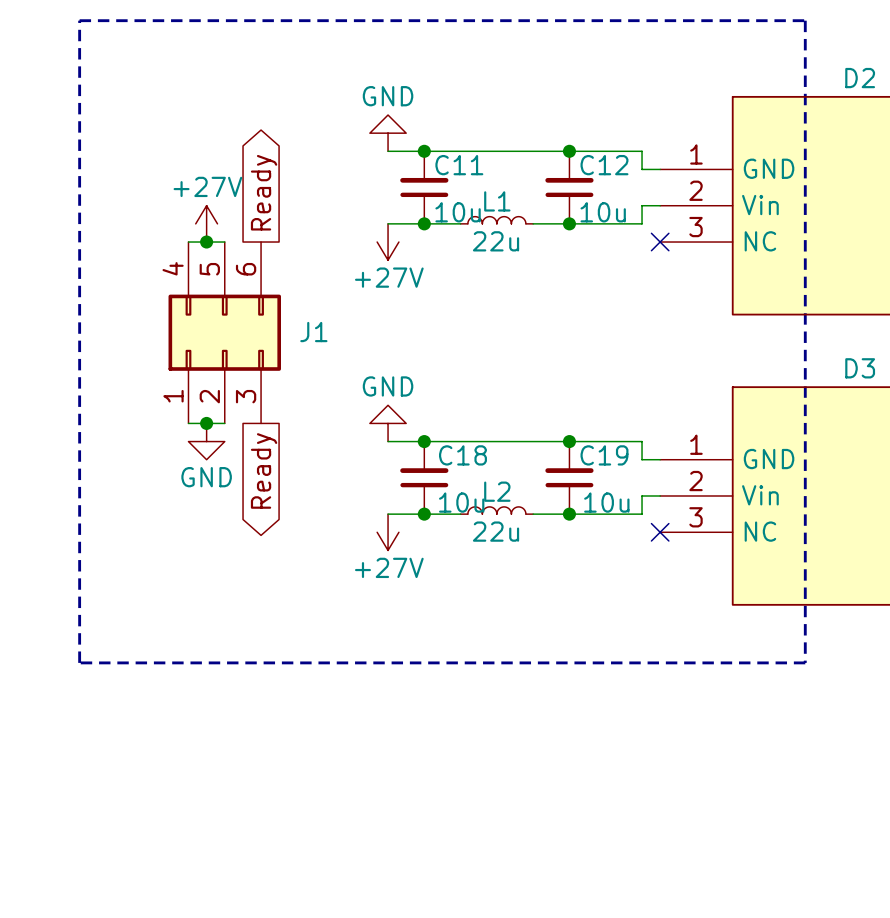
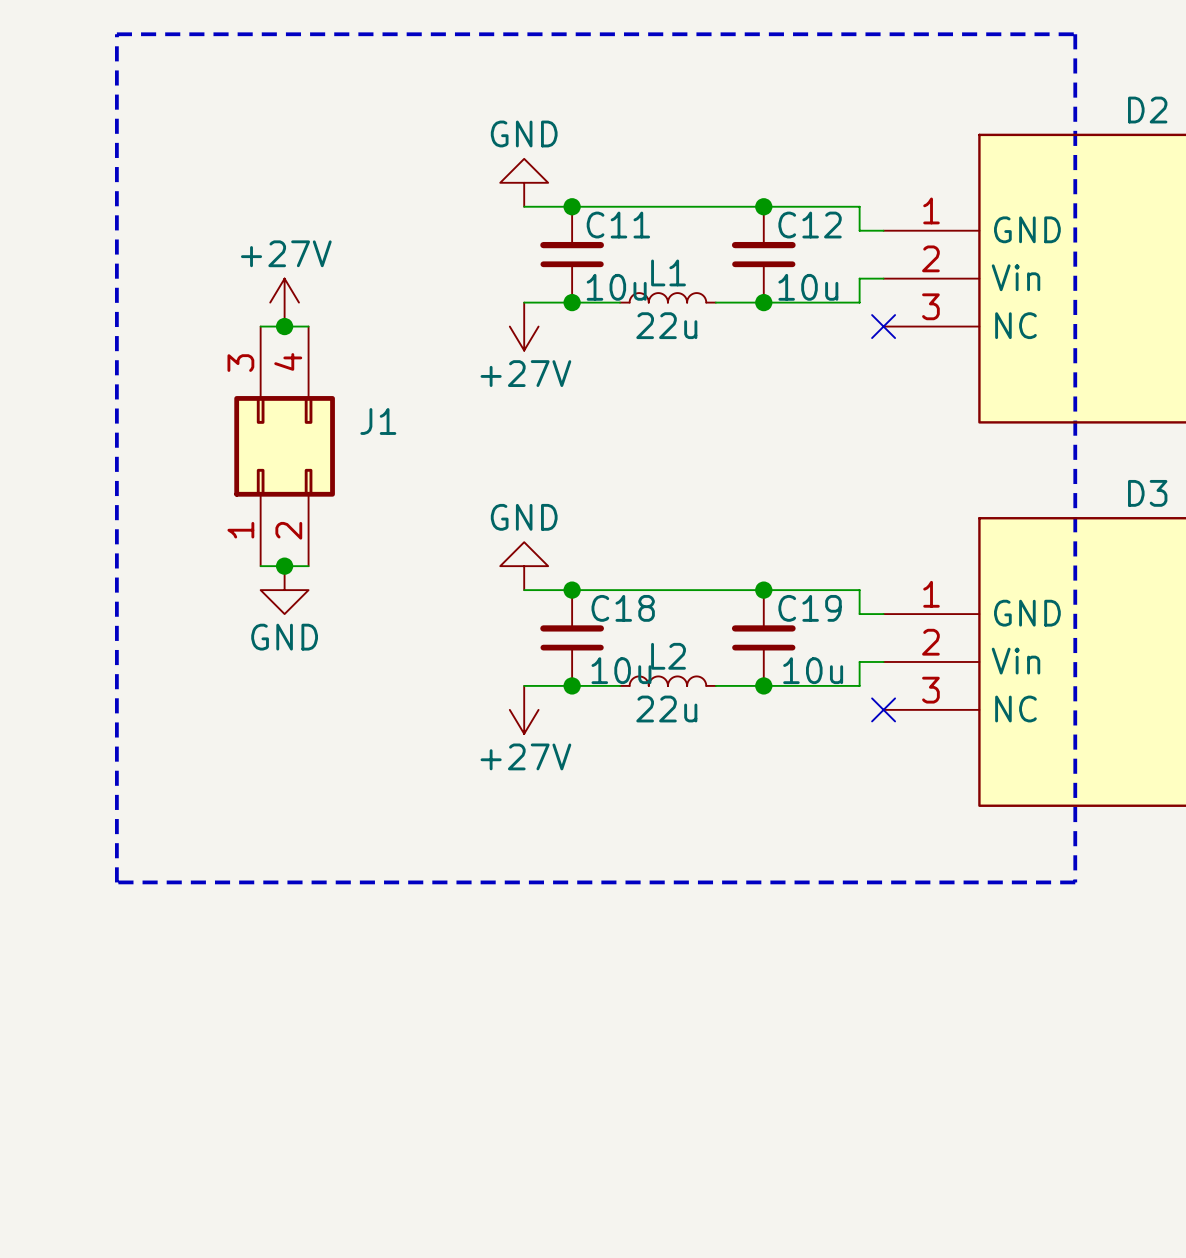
global label: Ready (264, 192) -> none
J1 symbol: [168, 242, 282, 424] -> [234, 326, 335, 567]
global label: Ready (264, 470) -> none

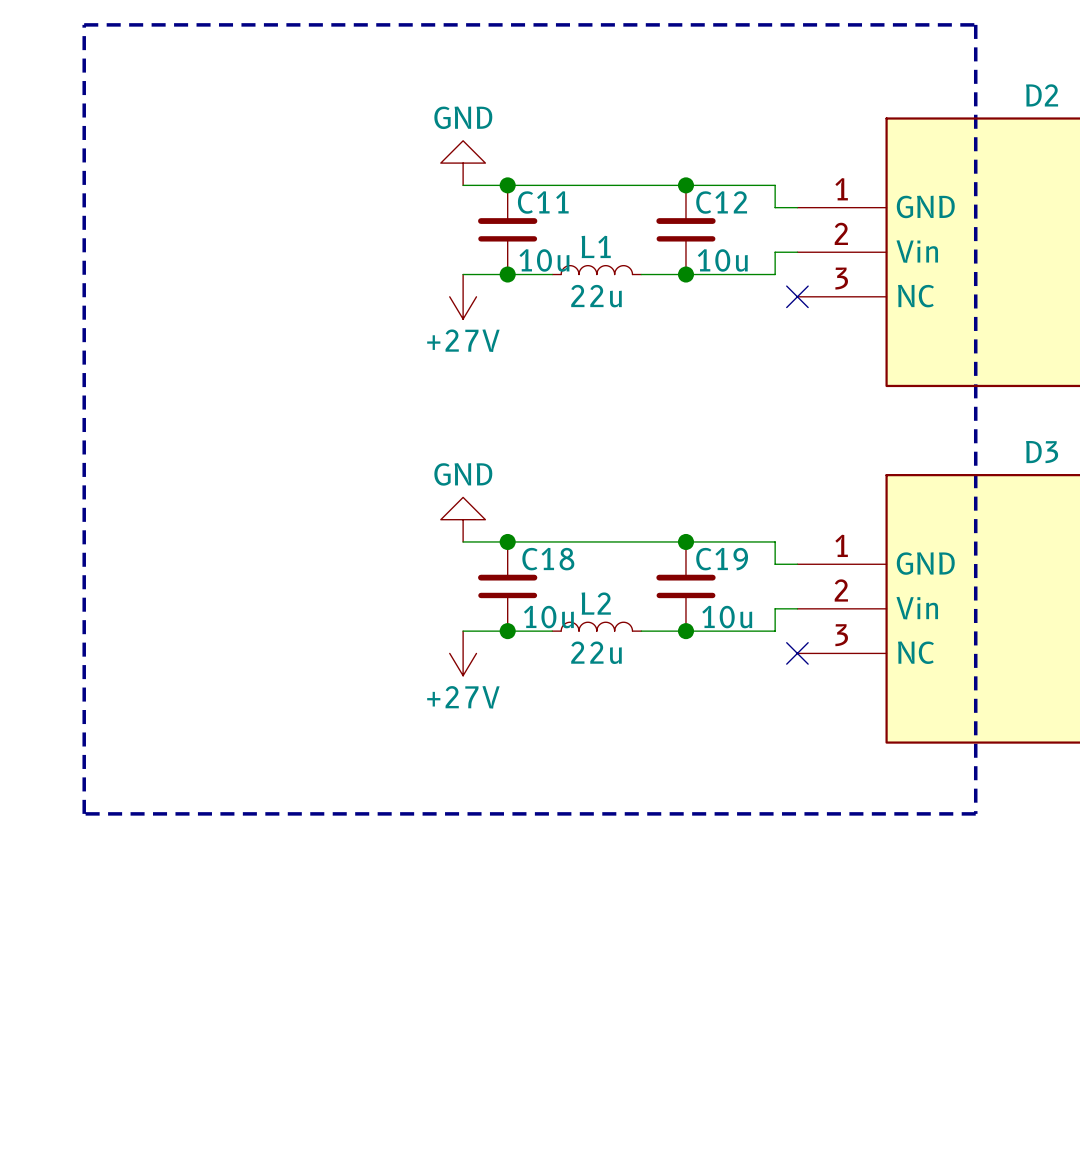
power symbol: +27V (284, 302) -> none
wire: (260, 326) (308, 326) -> none
junction: (284, 326) -> none
J1: (284, 446) -> none
wire: (260, 566) (308, 566) -> none
junction: (284, 566) -> none
power symbol: GND (284, 590) -> none

